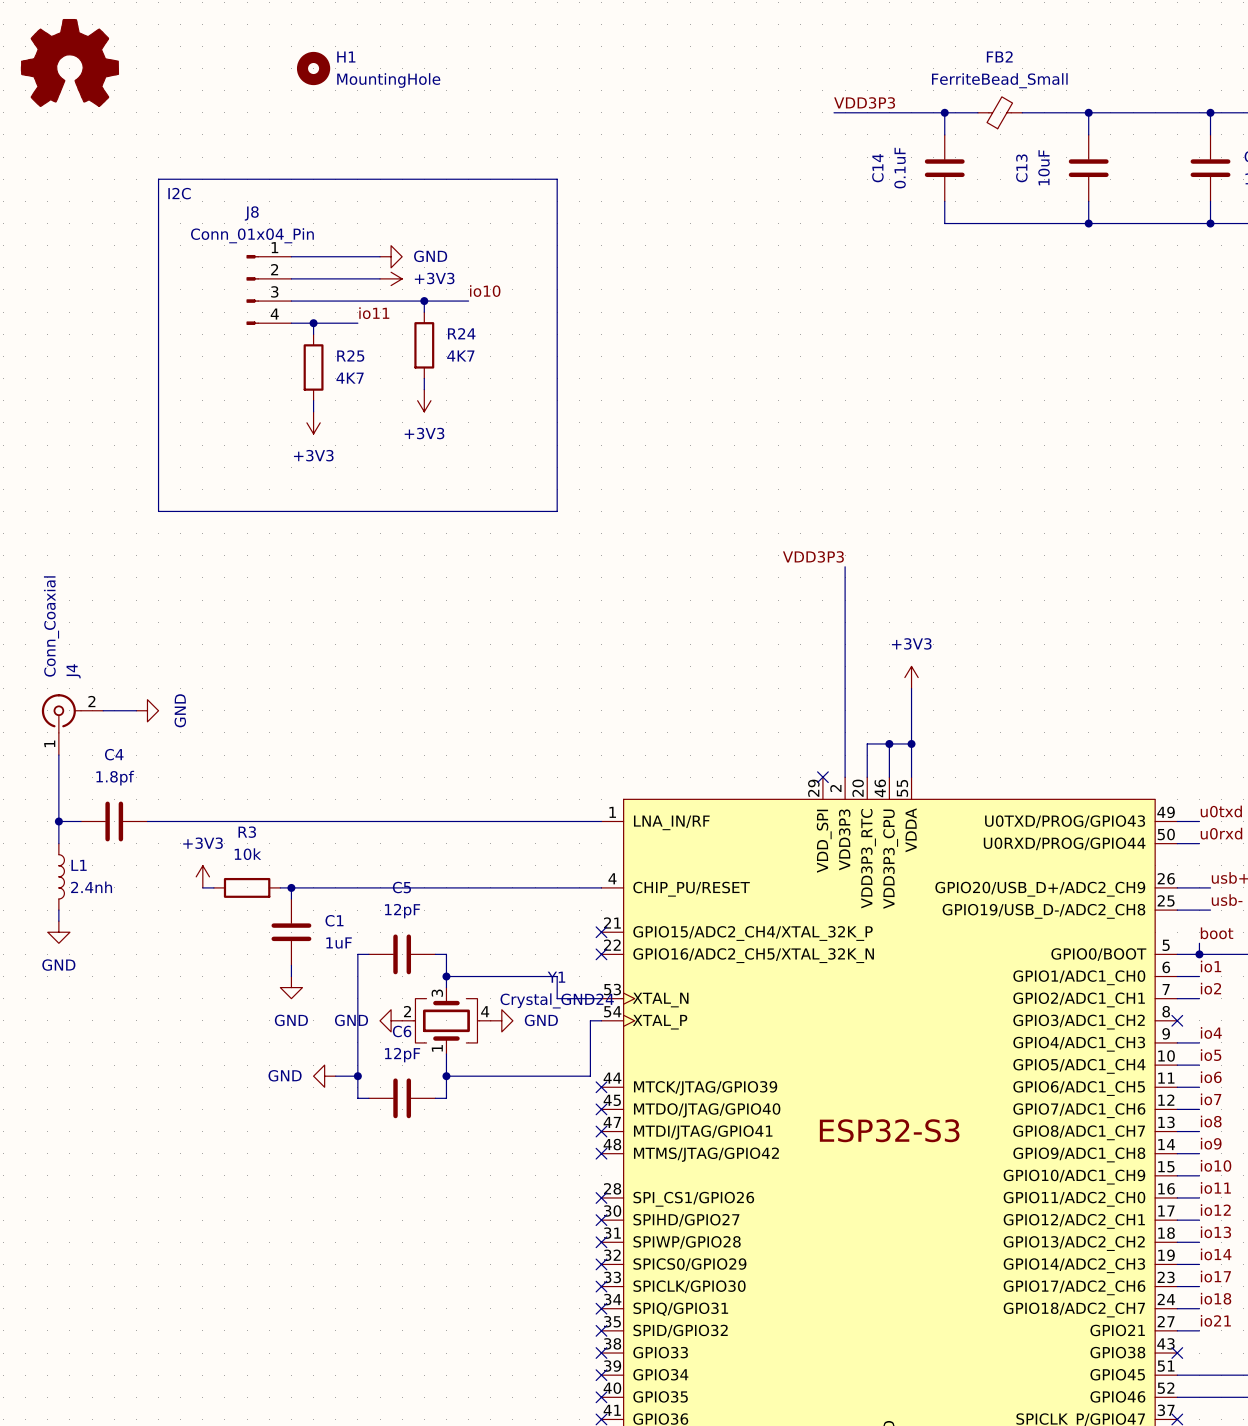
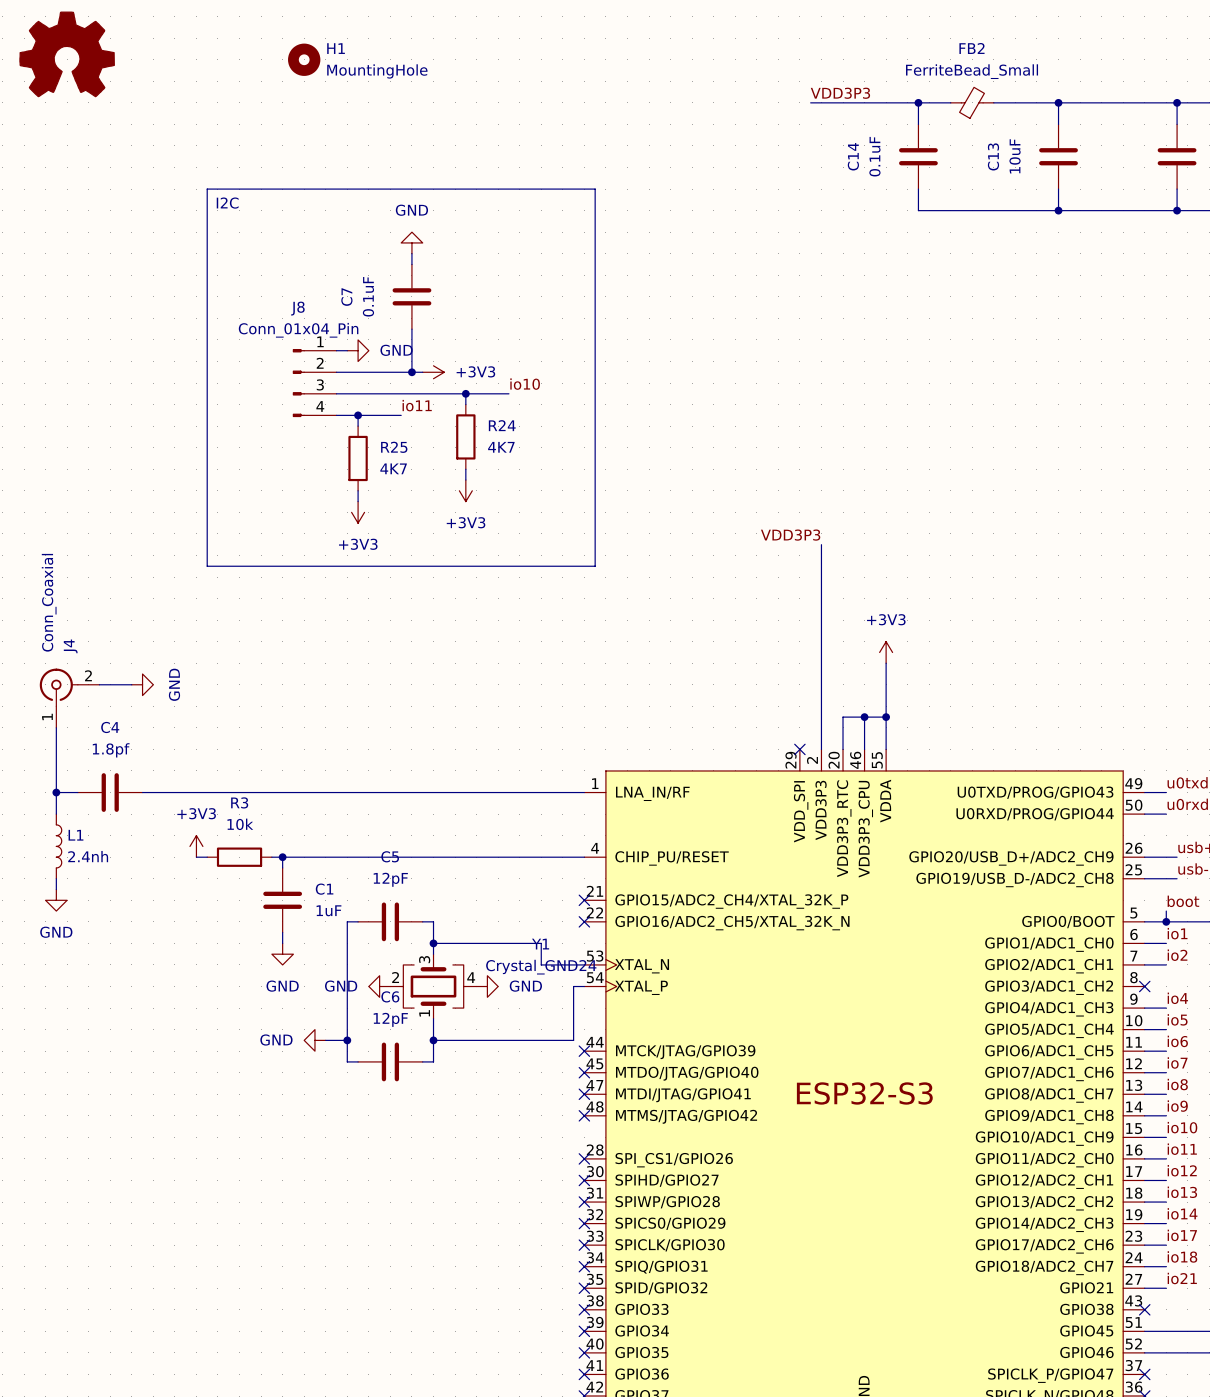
line: (158, 179) (557, 179) (557, 511) (158, 511) (158, 179) -> (207, 189) (207, 566) (595, 566) (595, 189) (207, 189)
text position: I2C (179, 193) -> I2C (227, 203)
wire: (291, 256) (380, 256) -> none
power symbol rotation: 0° (391, 256) -> 90° counterclockwise (411, 242)
power symbol position: GND (391, 256) -> GND (411, 242)
wire: none -> (411, 253) (411, 264)
wire: (291, 278) (380, 278) -> (336, 372) (422, 372)
power symbol: +3V3 (391, 278) -> none
J8 position: (268, 289) -> (314, 383)
label position: io10 (485, 291) -> io10 (525, 384)
wire: (291, 301) (468, 301) -> (336, 393) (508, 393)
junction: (424, 301) -> none
C7: none -> 0.1uF (411, 296)
label position: io11 (374, 313) -> io11 (417, 405)
wire: (291, 323) (357, 323) -> (336, 415) (401, 415)
wire: (313, 323) (313, 334) -> (358, 415) (358, 426)
junction: (313, 323) -> none
wire: none -> (411, 329) (411, 361)
R24 position: (424, 345) -> (465, 436)
R25 position: (313, 367) -> (358, 458)
wire: none -> (336, 350) (347, 350)
power symbol: none -> GND (358, 350)
junction: none -> (411, 372)
wire: (313, 400) (313, 411) -> (358, 490) (358, 501)
power symbol rotation: 0° (424, 400) -> 90° counterclockwise (433, 372)
power symbol position: +3V3 (424, 400) -> +3V3 (433, 372)
junction: none -> (465, 393)
power symbol: +3V3 (313, 422) -> none
junction: none -> (358, 415)
wire: none -> (465, 469) (465, 480)
power symbol: none -> +3V3 (465, 490)
power symbol: none -> +3V3 (358, 512)

